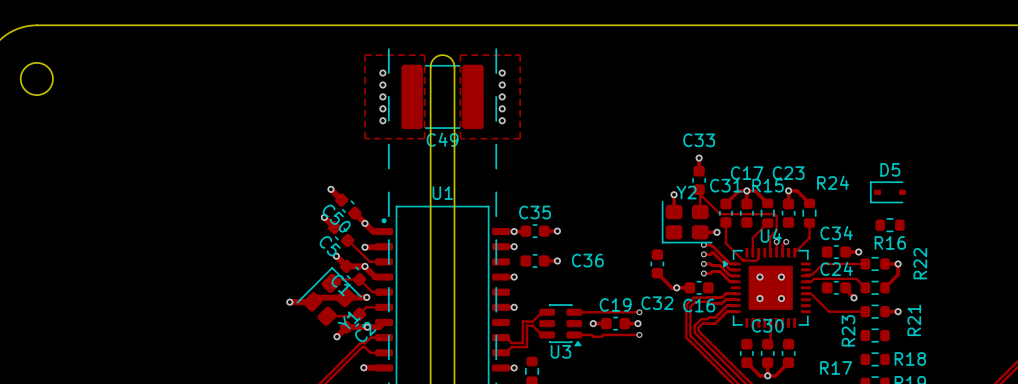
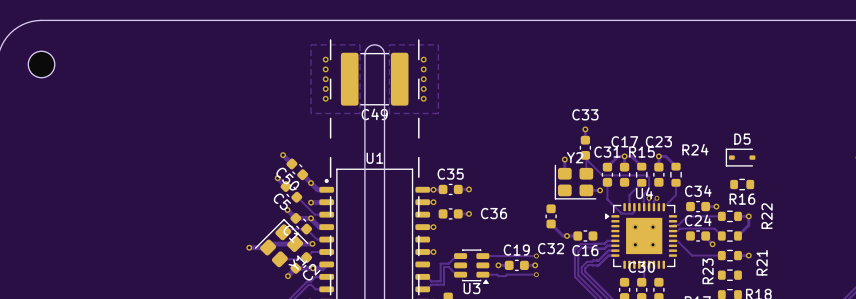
track: (703, 244) (710, 244) (730, 263) (735, 263) -> none
via: (703, 244) -> none
track: (703, 254) (712, 252) (730, 269) (735, 269) -> none
via: (703, 254) -> none
track: (703, 263) (720, 265) (730, 275) (735, 275) -> none
via: (703, 263) -> none
track: (703, 273) (720, 271) (730, 281) (735, 281) -> none
via: (703, 273) -> none

